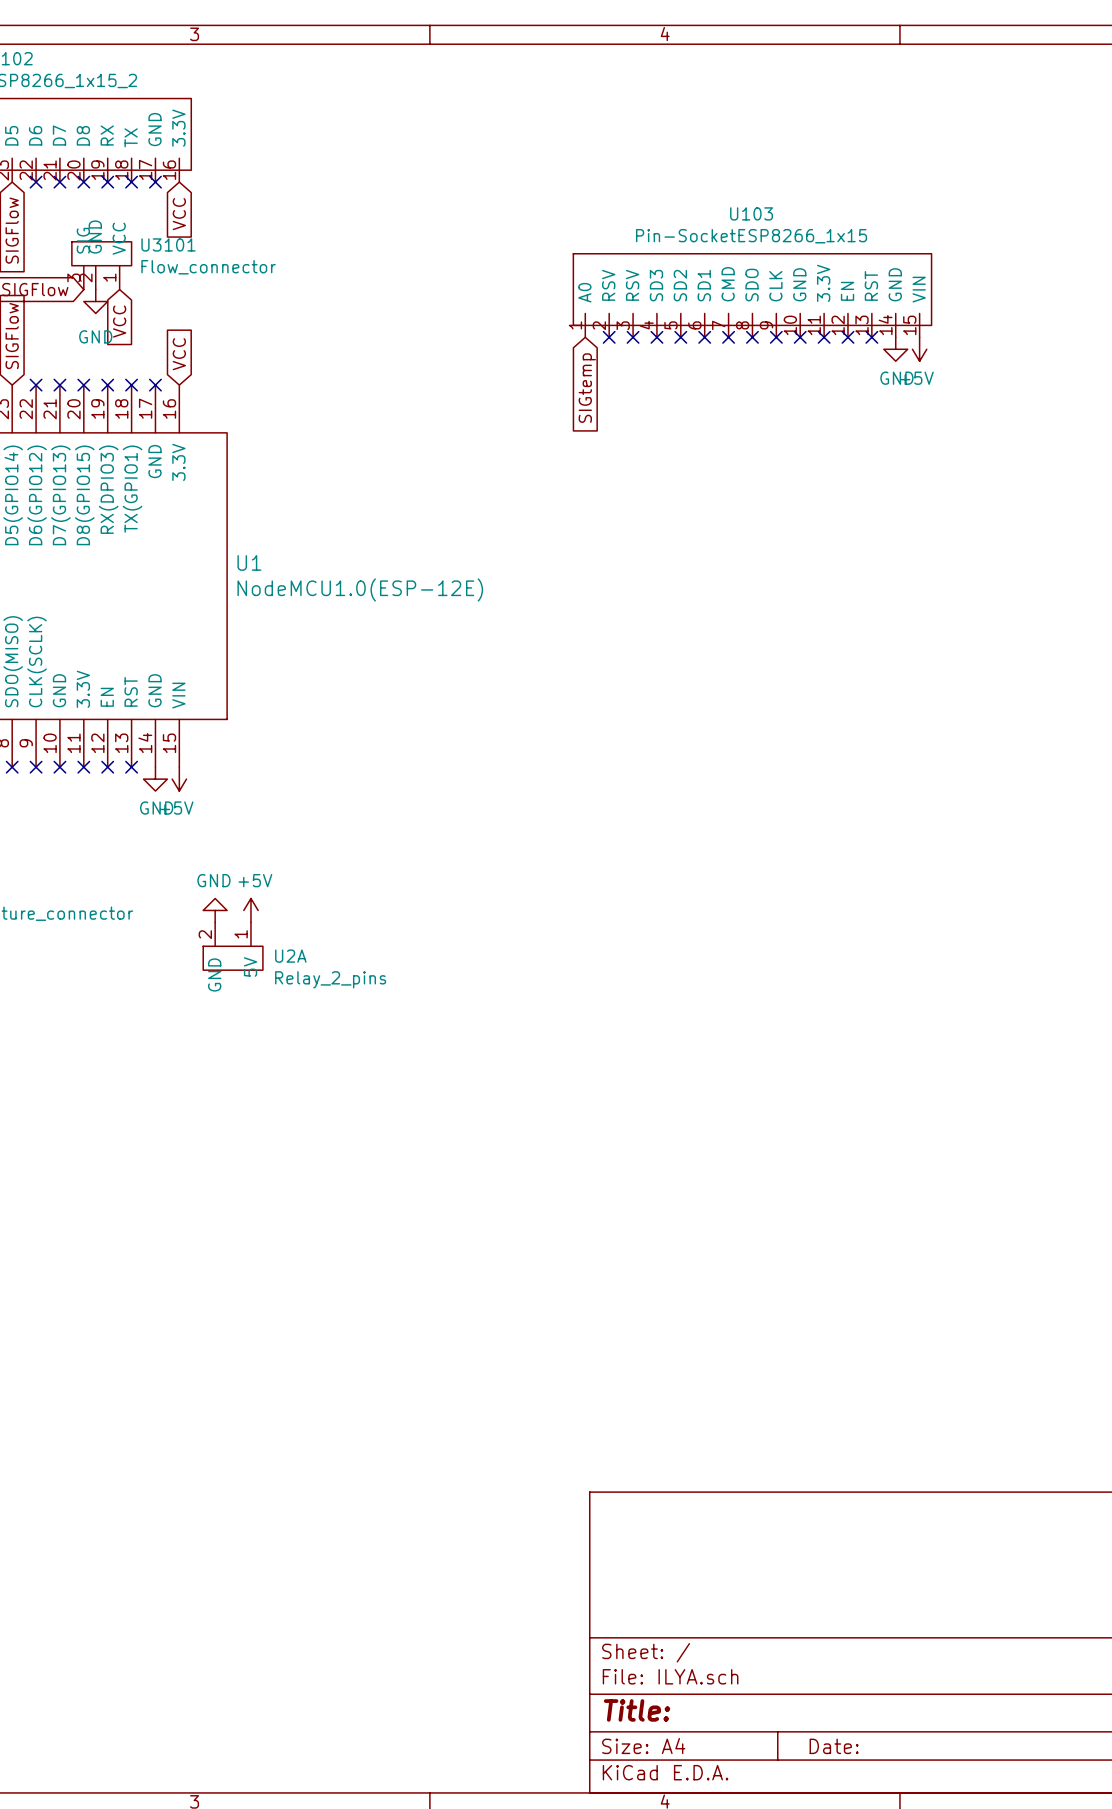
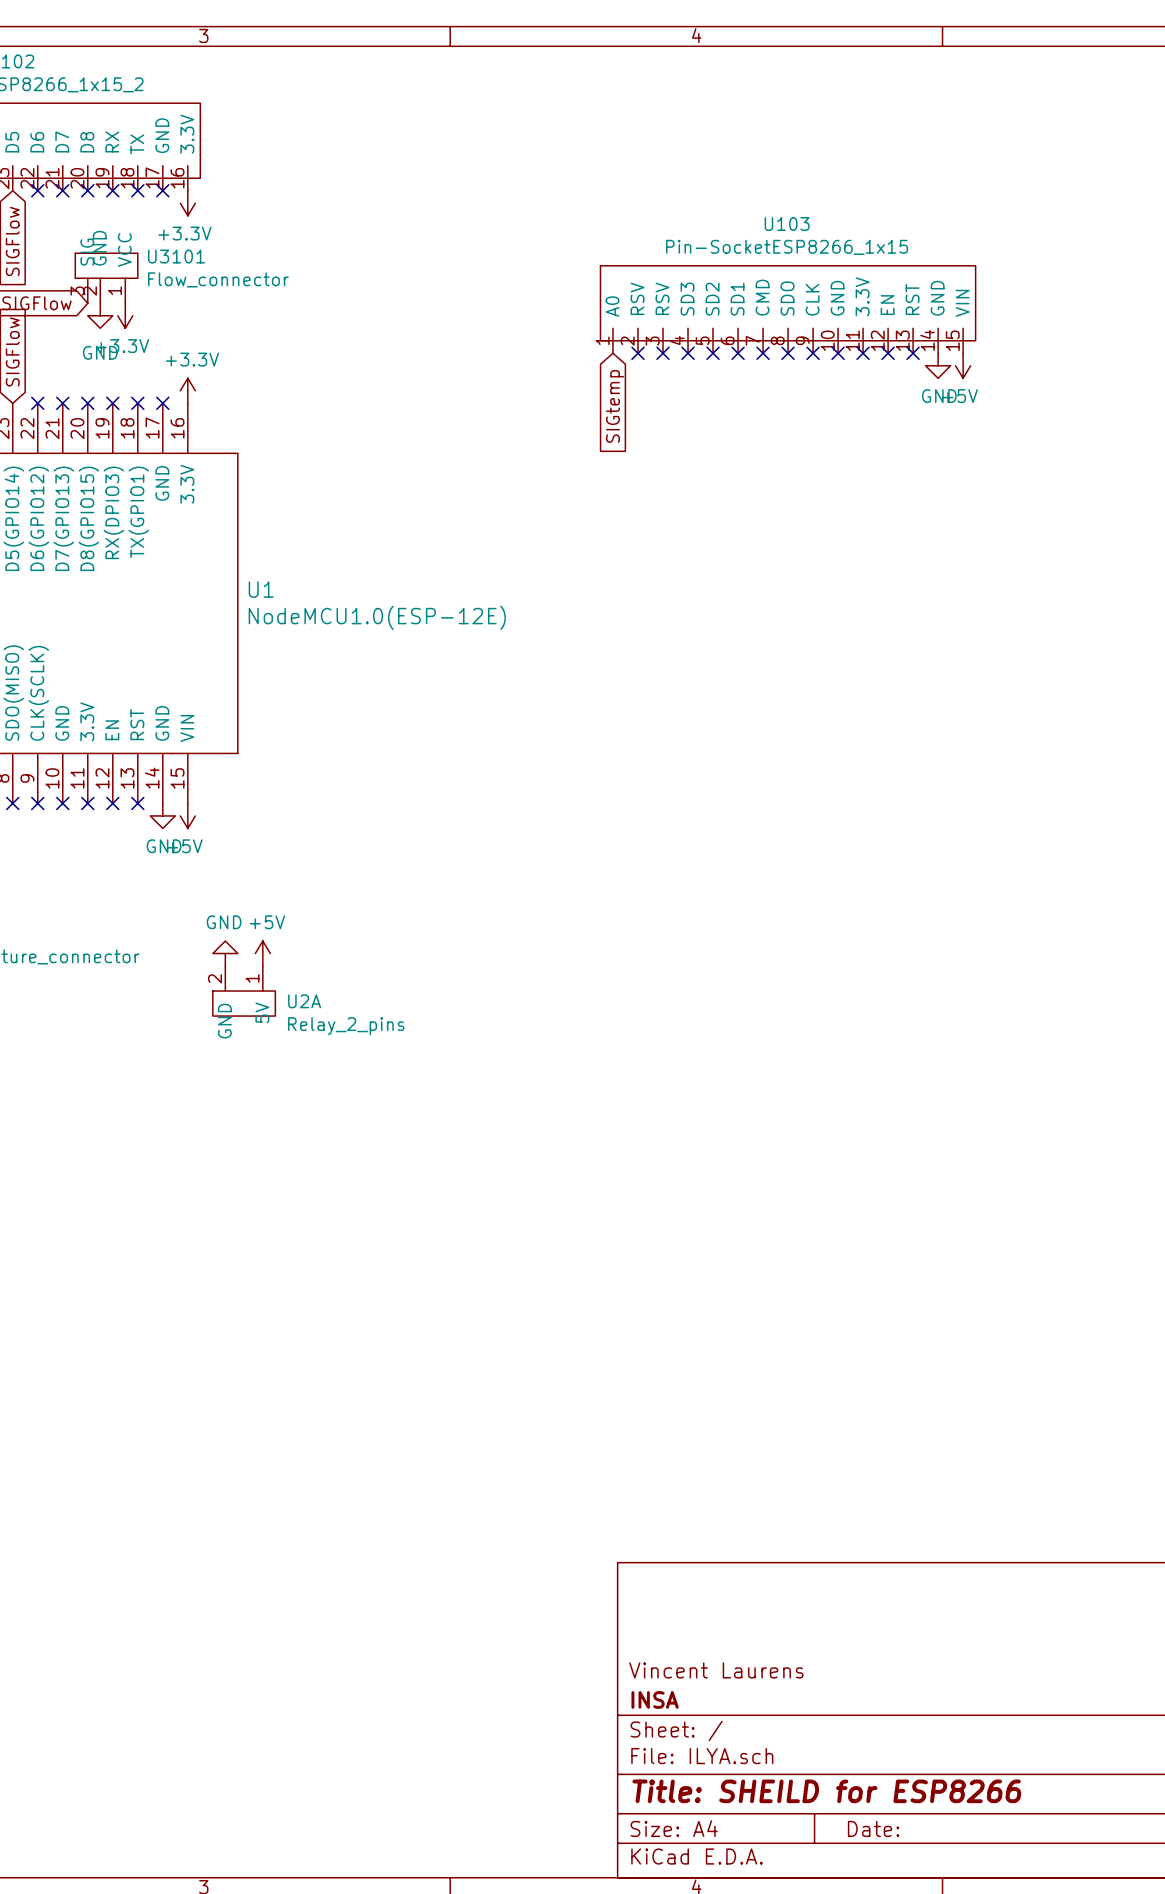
power symbol: none -> +3.3V (187, 203)
global label: VCC (179, 214) -> none
power symbol: none -> +3.3V (125, 315)
global label: VCC (119, 321) -> none
global label: VCC (179, 354) -> none
power symbol: none -> +3.3V (187, 390)
title block: none -> Vincent Laurens (716, 1670)
title block: none -> INSA (655, 1699)
title block: Title: (637, 1710) -> Title: SHEILD for ESP8266 (826, 1791)

